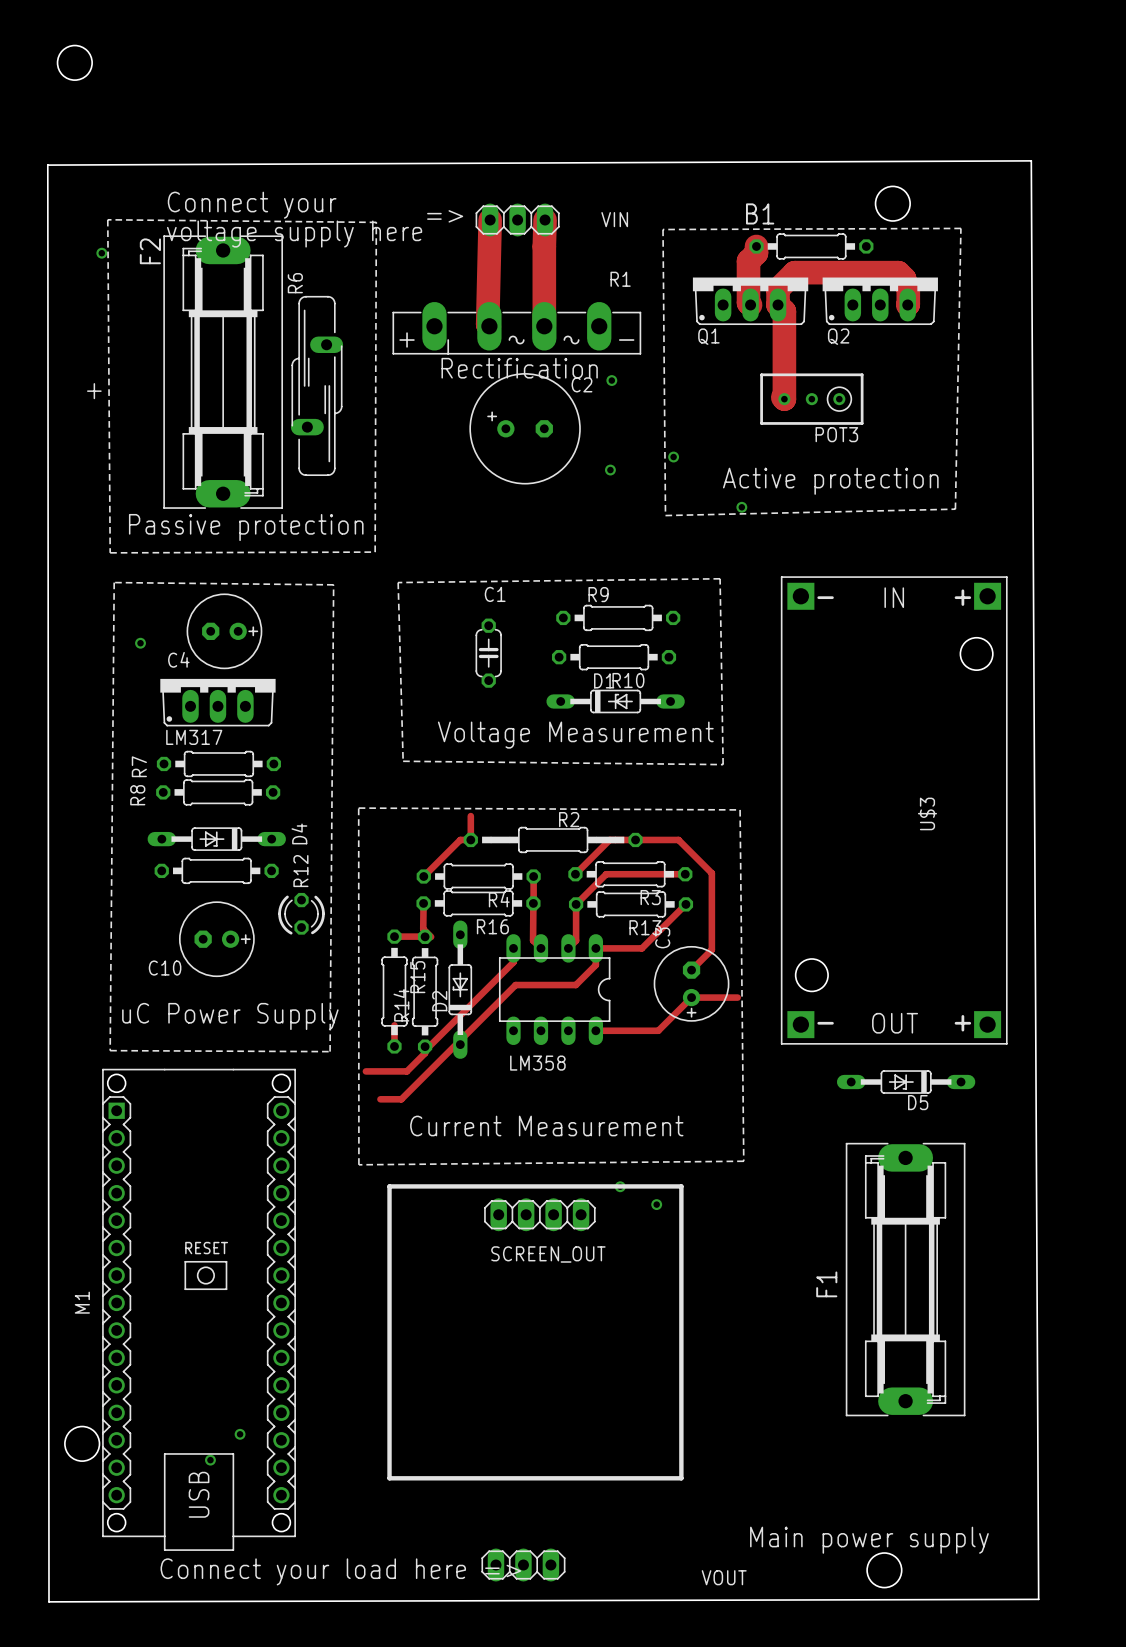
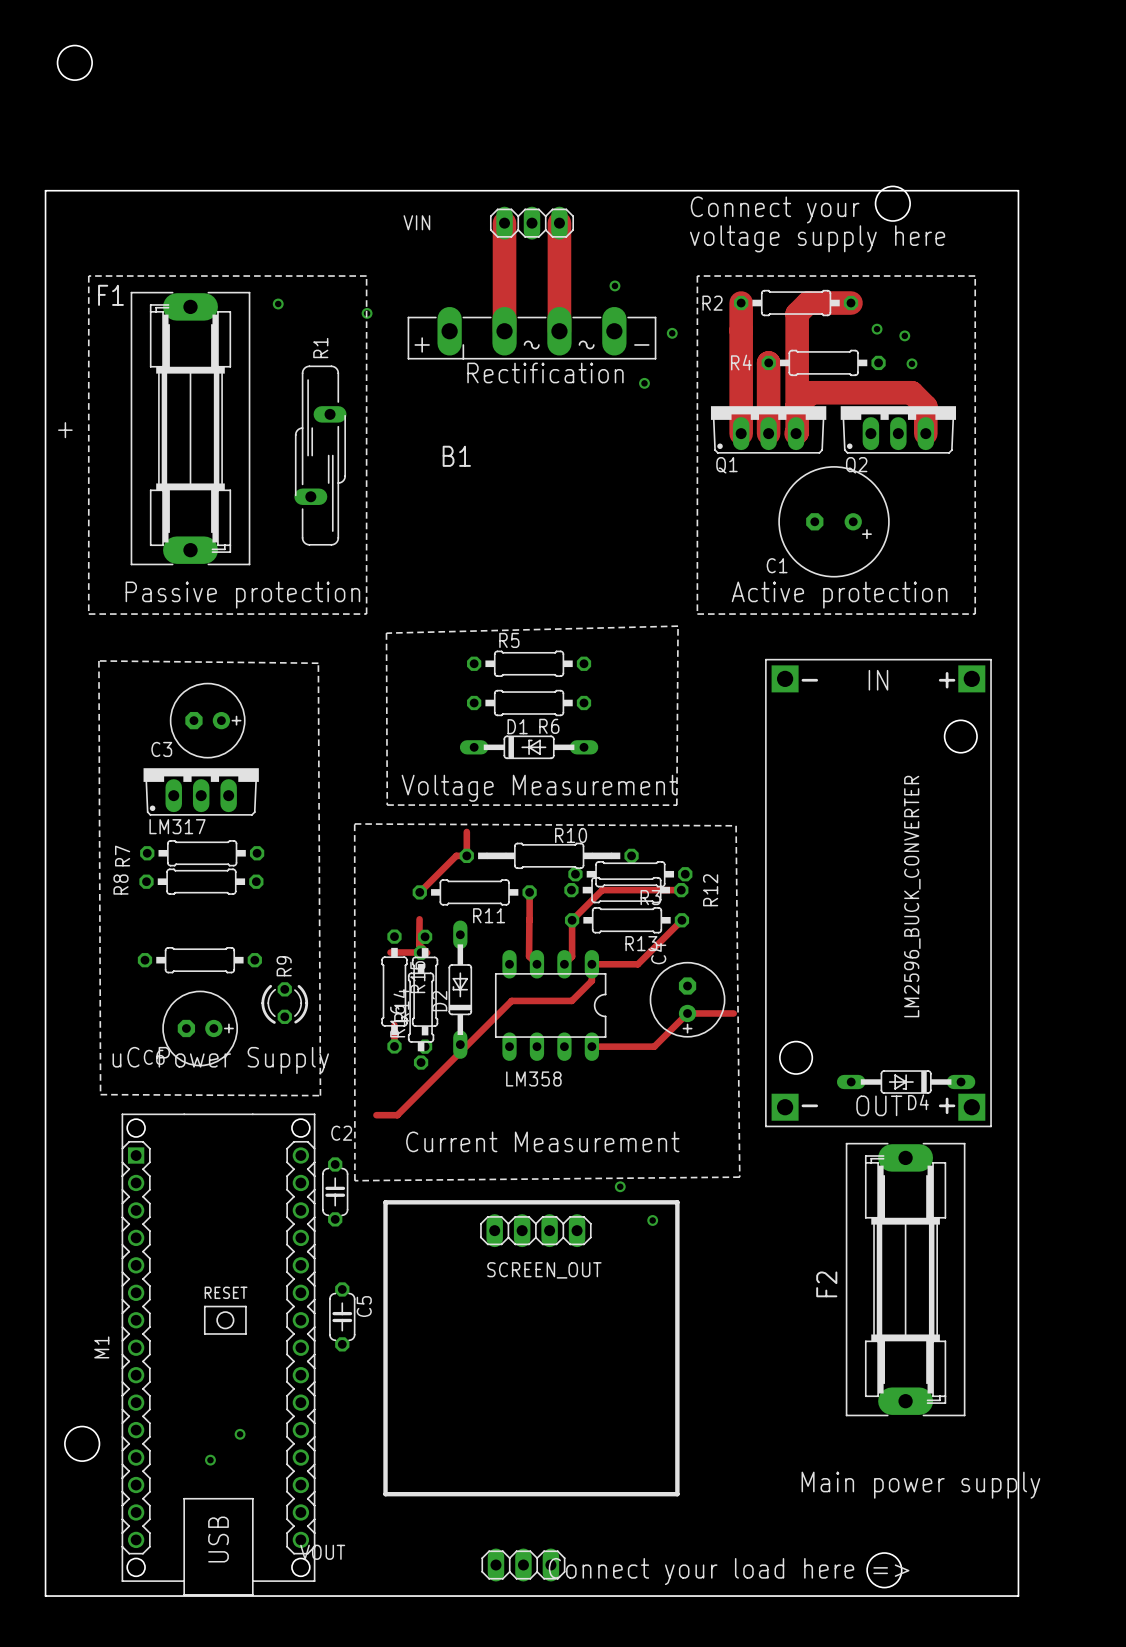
board edge: (1031, 160) (47, 165) (48, 1601) (1038, 1599) (1031, 160) -> (45, 190) (45, 1596) (1018, 1596) (1018, 190) (45, 190)
text: Connect your (252, 205) -> none
text: none -> Connect your (775, 209)
B1 name position: B1 (760, 213) -> B1 (456, 456)
text: => (445, 216) -> none
line: (107, 219) (376, 222) (375, 552) (110, 552) (107, 219) -> (88, 276) (88, 614) (366, 614) (366, 276) (88, 276)
VIN name position: VIN (614, 219) -> VIN (416, 222)
track: (490, 220) (487, 324) (489, 326) -> none
VIN position: (517, 220) -> (531, 223)
track: (545, 220) (544, 326) -> none
track: none -> (504, 223) (504, 331)
track: none -> (559, 223) (559, 331)
line: (960, 228) (663, 229) (665, 515) (955, 509) (960, 228) -> (697, 276) (697, 614) (975, 614) (975, 276) (697, 276)
R1 footprint: [749, 233, 874, 260] -> [294, 365, 347, 546]
text: voltage supply here (294, 234) -> none
text: none -> voltage supply here (817, 238)
track: (756, 246) (756, 253) (748, 261) (748, 302) (750, 304) -> none
via: (101, 253) -> none
R1 name position: R1 (620, 279) -> R1 (320, 348)
R6 name position: R6 (295, 283) -> R6 (549, 726)
via: none -> (614, 285)
R6 footprint: [290, 295, 344, 477] -> [467, 689, 592, 717]
Q1 position: (750, 301) -> (768, 429)
Q2 position: (880, 301) -> (898, 429)
track: none -> (741, 303) (741, 433)
track: none -> (850, 303) (808, 303) (797, 313) (796, 433)
via: none -> (278, 304)
track: (907, 304) (908, 286) (898, 272) (794, 272) (778, 289) (778, 304) (784, 311) (784, 399) (782, 397) -> none
via: none -> (367, 313)
B1 position: (516, 328) -> (531, 333)
via: none -> (877, 329)
via: none -> (672, 333)
via: none -> (904, 335)
track: none -> (768, 362) (768, 433)
via: none -> (911, 363)
text position: Rectification (519, 368) -> Rectification (545, 372)
F2: (223, 372) -> none
C2 footprint: [469, 373, 581, 485] -> [322, 1157, 349, 1227]
via position: (611, 380) -> (644, 383)
C2 name position: C2 (581, 384) -> C2 (341, 1133)
text position: + (94, 391) -> + (65, 430)
POT3: (811, 399) -> none
track: none -> (797, 406) (810, 392) (911, 392) (925, 406) (925, 433)
F1: none -> (190, 428)
via: (673, 457) -> none
via: (610, 470) -> none
text position: Active protection (830, 481) -> Active protection (839, 595)
via: (741, 507) -> none
text position: Passive protection (246, 527) -> Passive protection (242, 595)
line: (720, 578) (398, 582) (403, 761) (723, 764) (720, 578) -> (678, 626) (386, 633) (387, 805) (676, 805) (678, 626)
line: (114, 582) (333, 584) (330, 1051) (110, 1050) (114, 582) -> (98, 660) (100, 1094) (320, 1095) (318, 663) (98, 660)
C1 name position: C1 (495, 594) -> C1 (777, 565)
R9 name rotation: 0° (598, 594) -> 90° counterclockwise (284, 966)
R9 name position: R9 (598, 594) -> R9 (284, 966)
R9 position: (618, 617) -> (199, 960)
C1 footprint: [475, 618, 502, 688] -> [778, 466, 890, 578]
C4 rotation: 0° (224, 631) -> 90° clockwise (687, 999)
C4 position: (224, 631) -> (687, 999)
via: (140, 643) -> none
R10 footprint: [551, 643, 677, 671] -> [459, 842, 639, 870]
R5: none -> (529, 663)
R10 name position: R10 (628, 680) -> R10 (571, 835)
D1 position: (615, 701) -> (529, 747)
LM317 position: (217, 702) -> (201, 791)
text position: Voltage Measurement (575, 735) -> Voltage Measurement (539, 788)
R7 position: (218, 763) -> (202, 853)
R8 position: (218, 792) -> (201, 881)
line: (358, 808) (358, 1164) (743, 1161) (740, 809) (358, 808) -> (354, 823) (354, 1180) (739, 1177) (736, 825) (354, 823)
U$3: (894, 810) -> none
track: (470, 816) (470, 839) (460, 839) (423, 876) -> (466, 831) (466, 855) (456, 855) (419, 892)
R2 name position: R2 (569, 819) -> R2 (712, 303)
R2 footprint: [463, 826, 643, 854] -> [734, 289, 859, 317]
D4: (216, 839) -> none
R12 position: (216, 870) -> (626, 890)
track: (575, 874) (609, 839) (678, 839) (711, 873) (711, 949) (691, 970) -> none
track: (685, 874) (606, 874) (576, 904) (576, 940) (568, 948) -> (681, 890) (602, 890) (572, 920) (572, 956) (564, 964)
R4 position: (478, 876) -> (823, 362)
track: (533, 876) (533, 940) (540, 948) -> (529, 892) (529, 956) (536, 964)
R11: none -> (474, 892)
LM2596_BUCK_CONVERTER: none -> (878, 893)
R4 name position: R4 (499, 899) -> R4 (741, 362)
track: (423, 903) (423, 929) (431, 936) -> (419, 919) (419, 944) (427, 952)
R16 rotation: 0° (478, 903) -> 90° clockwise (421, 1007)
R16 position: (478, 903) -> (421, 1007)
R13 position: (631, 904) -> (627, 920)
track: (685, 904) (641, 948) (595, 948) (595, 965) (575, 985) (515, 985) (401, 1099) (380, 1099) -> (681, 920) (637, 964) (591, 964) (591, 980) (571, 1000) (511, 1000) (397, 1115) (376, 1115)
part position: (301, 913) -> (284, 1003)
track: (394, 936) (425, 936) -> (390, 952) (421, 952)
C10: (216, 939) -> none
track: (513, 948) (513, 962) (425, 1050) -> none
C3 rotation: 0° (691, 983) -> 90° counterclockwise (207, 720)
C3 position: (691, 983) -> (207, 720)
LM358 position: (554, 989) -> (550, 1005)
track: (737, 997) (691, 997) (658, 1030) (595, 1030) -> (733, 1013) (687, 1013) (654, 1046) (591, 1046)
text position: uC Power Supply (230, 1016) -> uC Power Supply (220, 1060)
C6: none -> (200, 1028)
track: (425, 1046) (425, 1053) (406, 1071) (365, 1071) -> none
D5 name: D5 (918, 1102) -> D4 (918, 1102)
text position: Current Measurement (546, 1125) -> Current Measurement (542, 1141)
line: (389, 1186) (681, 1186) (681, 1478) (389, 1478) (389, 1186) -> (385, 1202) (677, 1202) (677, 1494) (385, 1494) (385, 1202)
via position: (656, 1204) -> (652, 1220)
SCREEN_OUT position: (539, 1214) -> (535, 1230)
F1 name: F1 (826, 1284) -> F2 (826, 1284)
M1 position: (199, 1309) -> (218, 1354)
C5: none -> (342, 1316)
text position: Main power supply (869, 1540) -> Main power supply (920, 1485)
text: Connect your load here => (340, 1571) -> none
text: none -> Connect your load here => (729, 1571)
VOUT name position: VOUT (724, 1577) -> VOUT (322, 1552)

